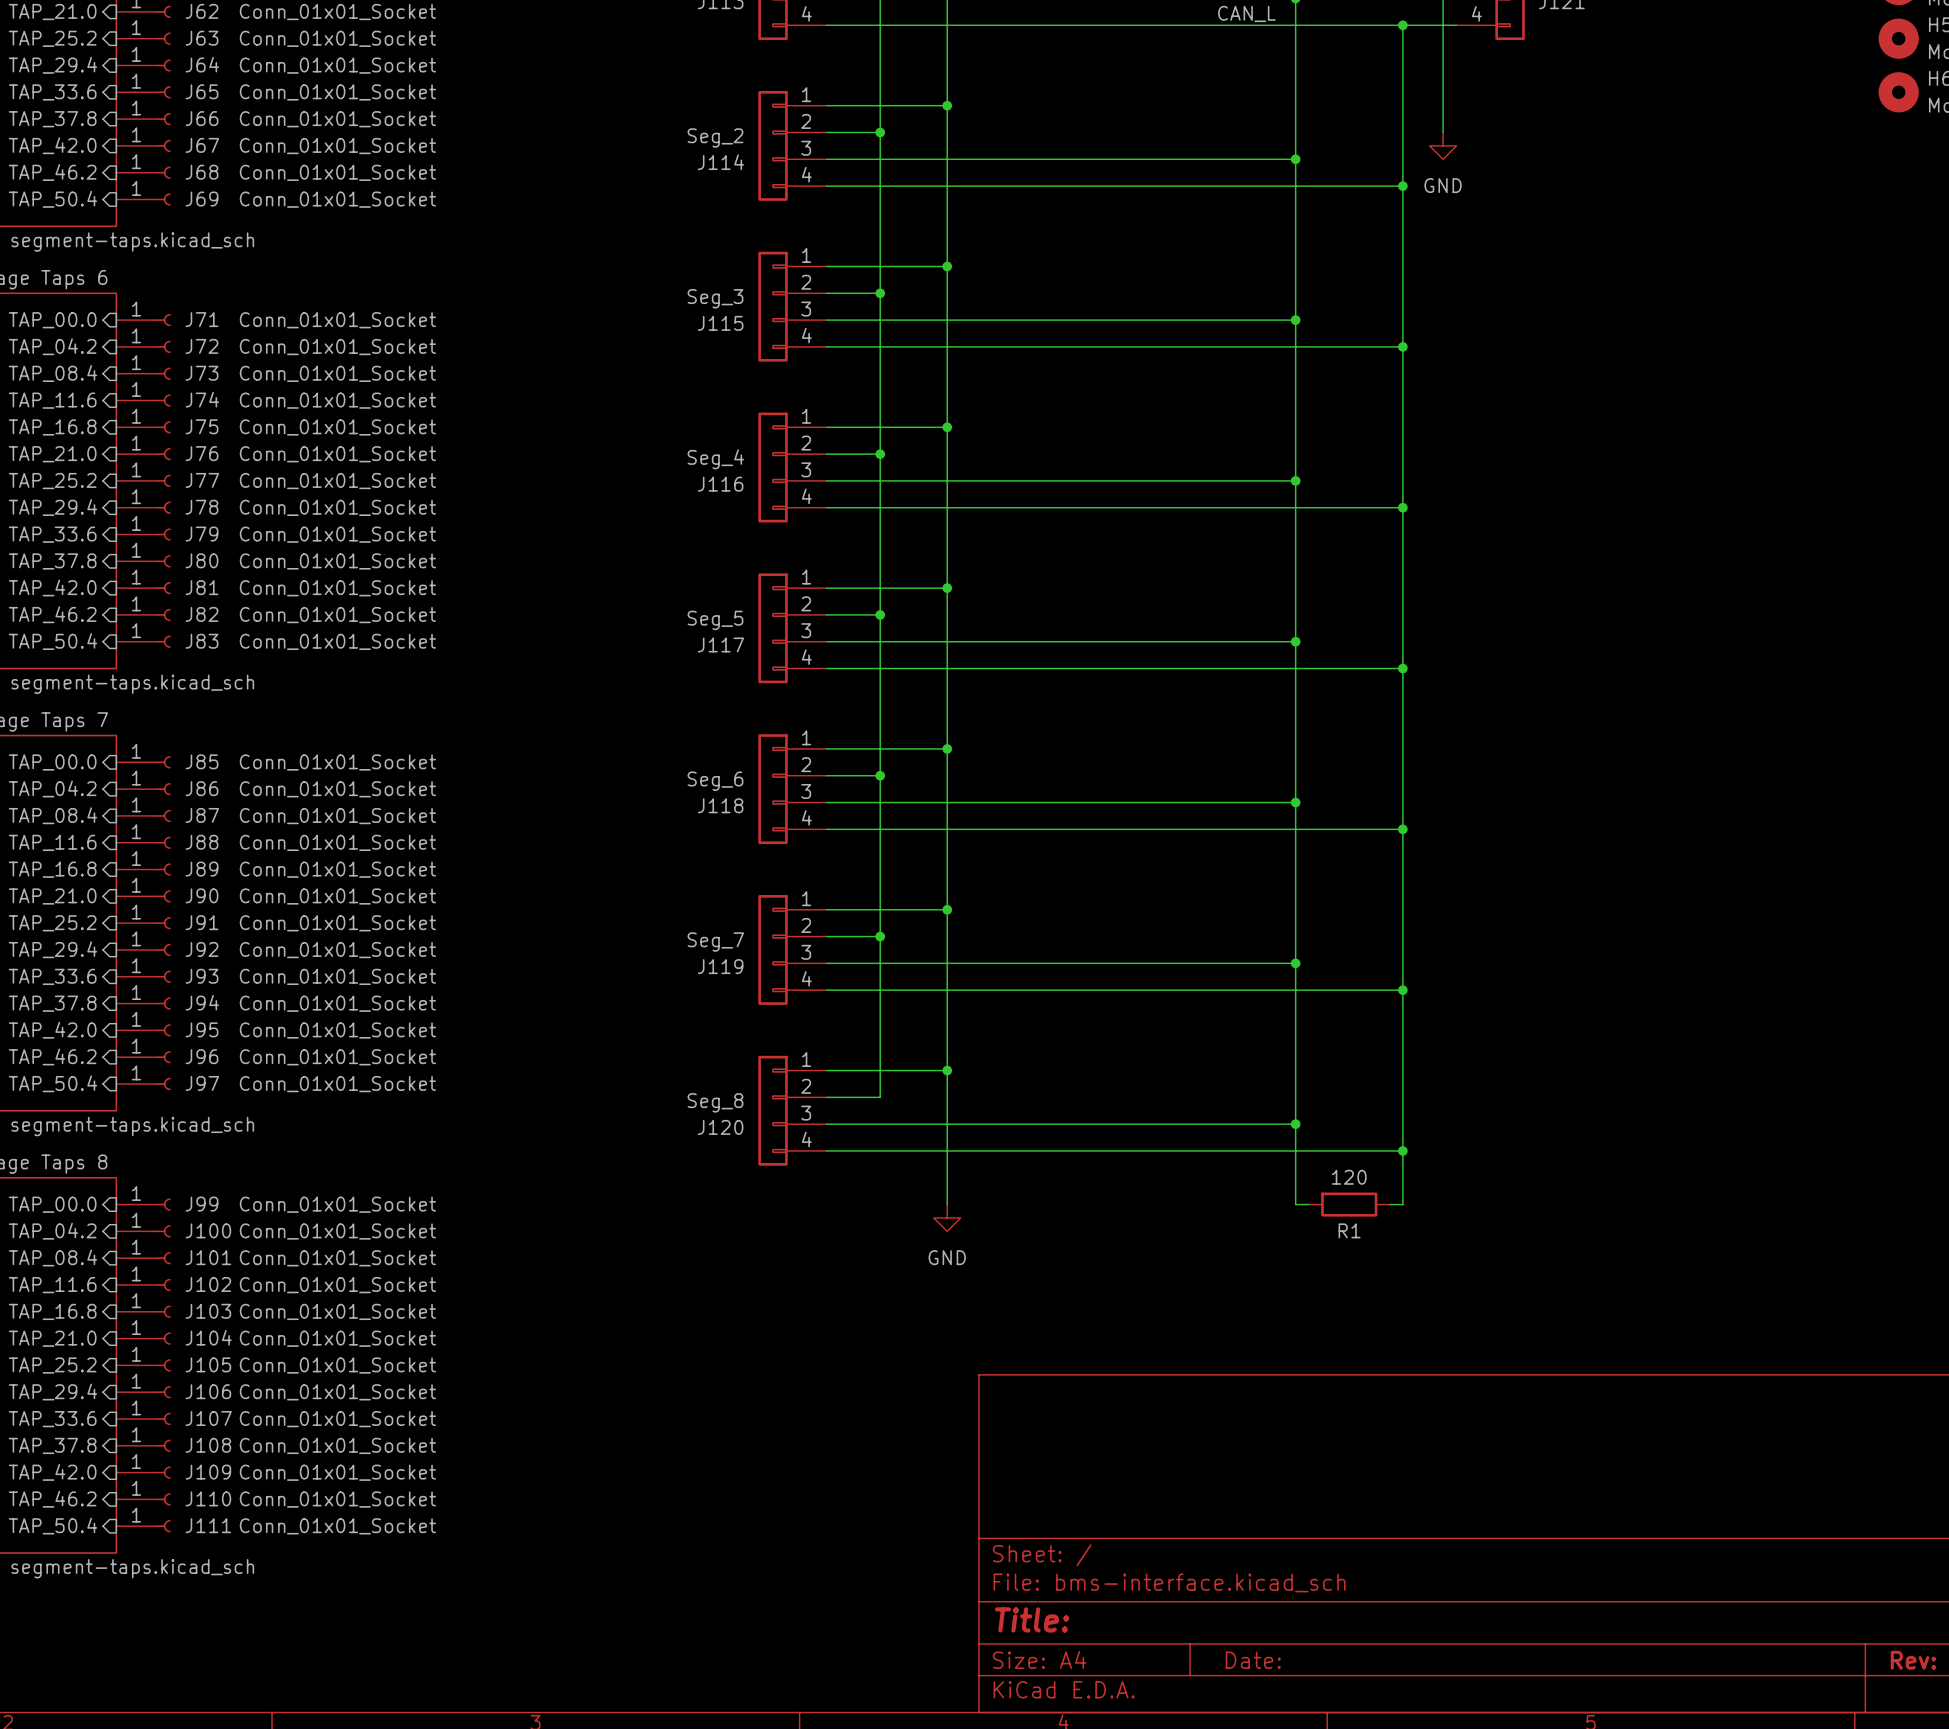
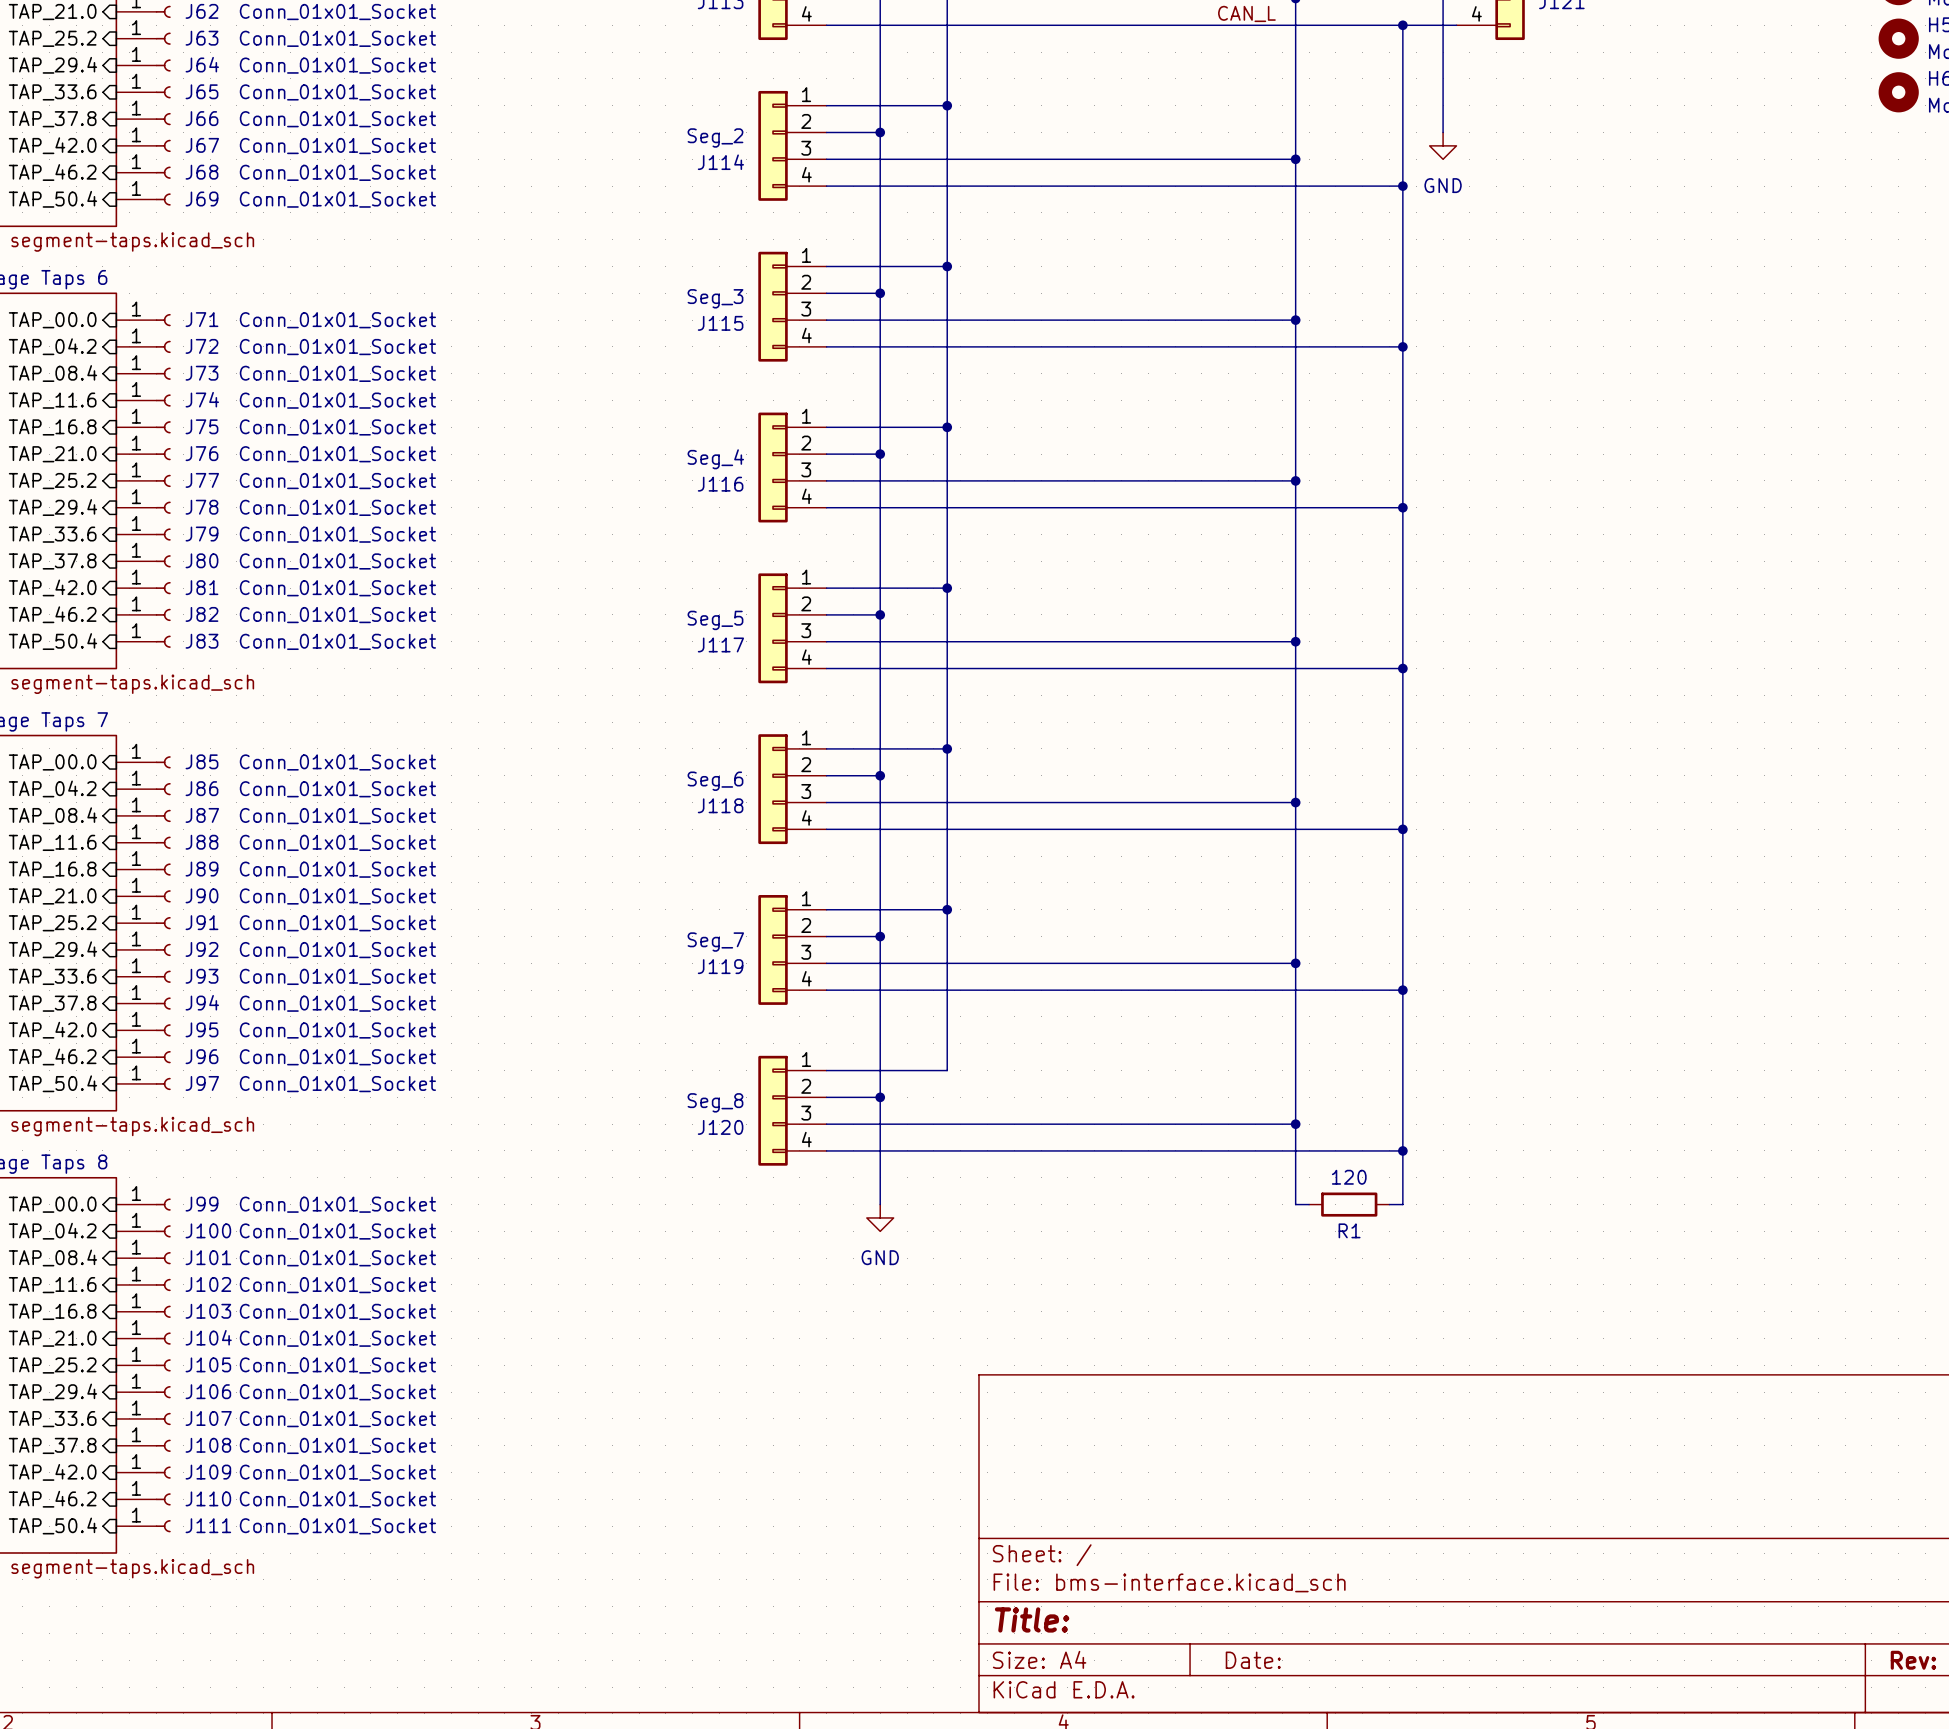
wire: (947, 1070) (947, 1204) -> none
junction: (947, 1070) -> none
wire: none -> (880, 1097) (880, 1204)
junction: none -> (880, 1097)
power symbol position: GND (947, 1217) -> GND (880, 1217)

